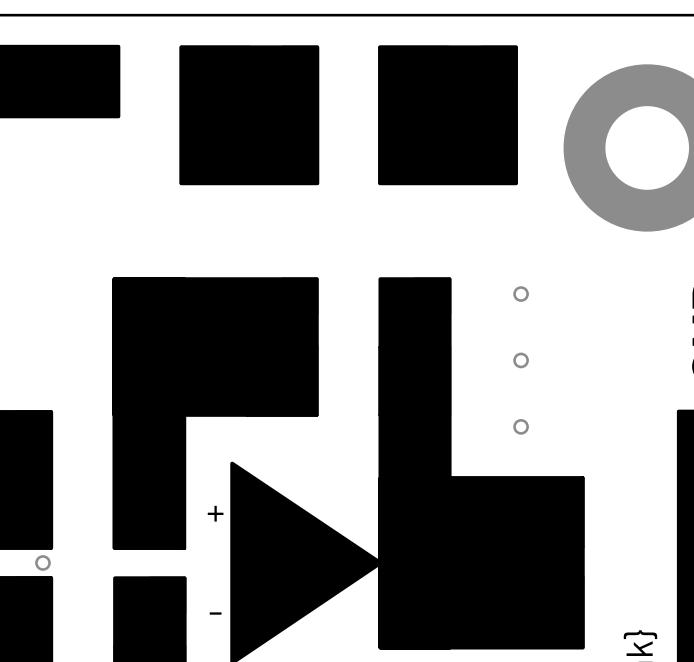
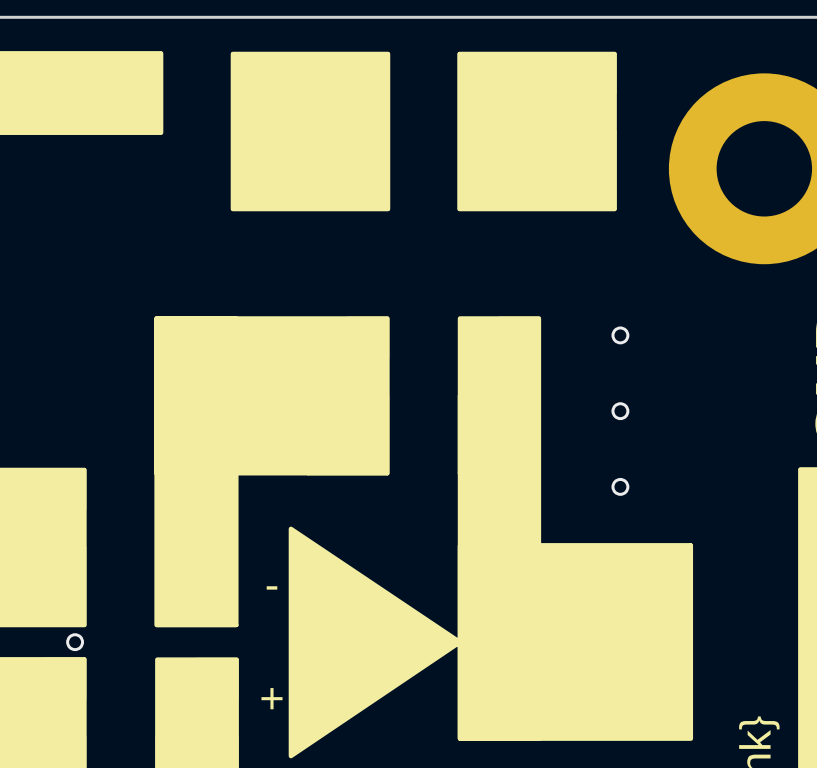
text: + (215, 513) -> - (272, 587)
text: - (215, 613) -> + (271, 698)

